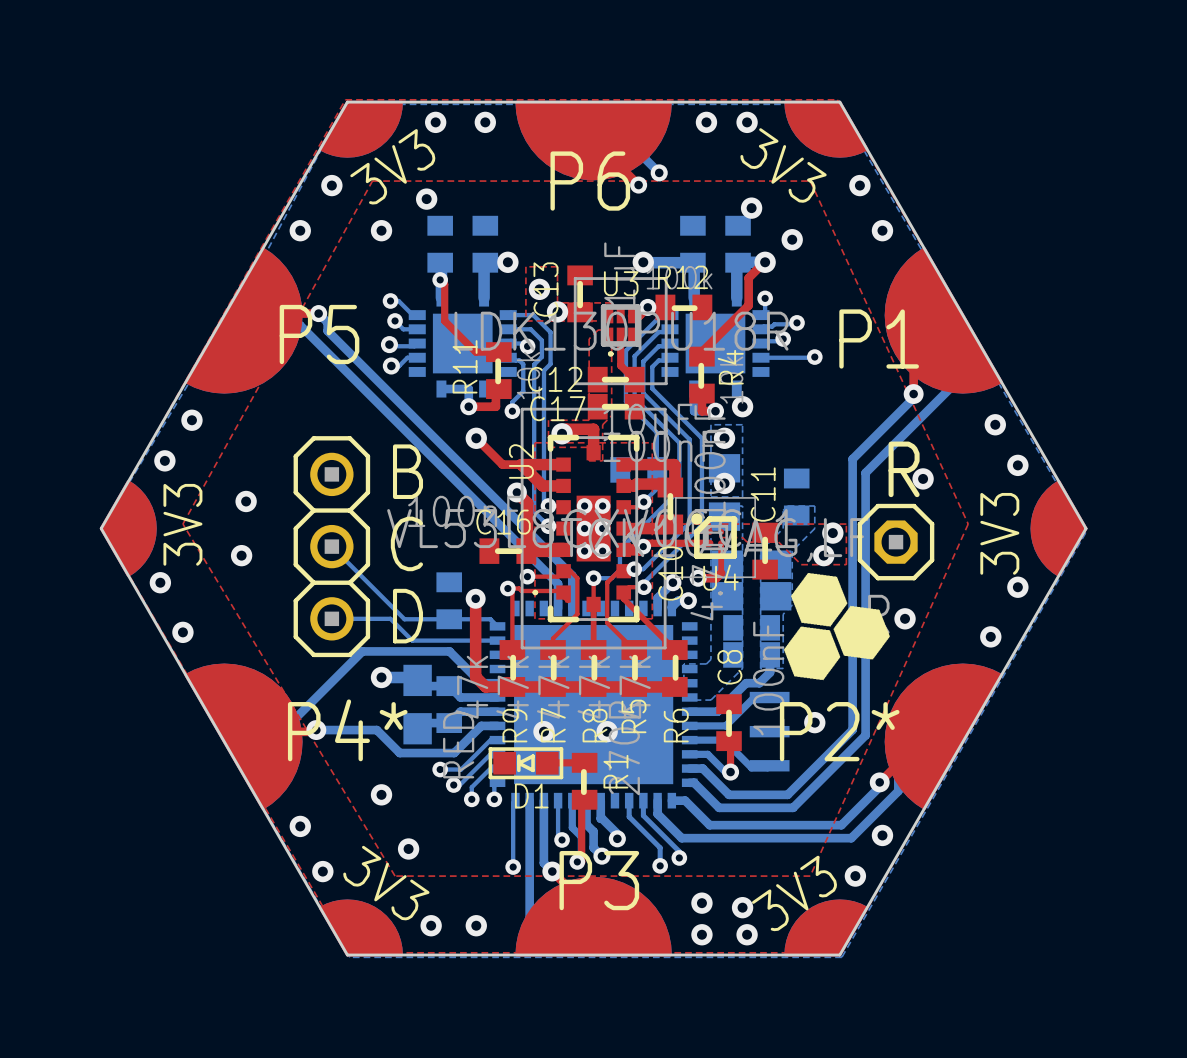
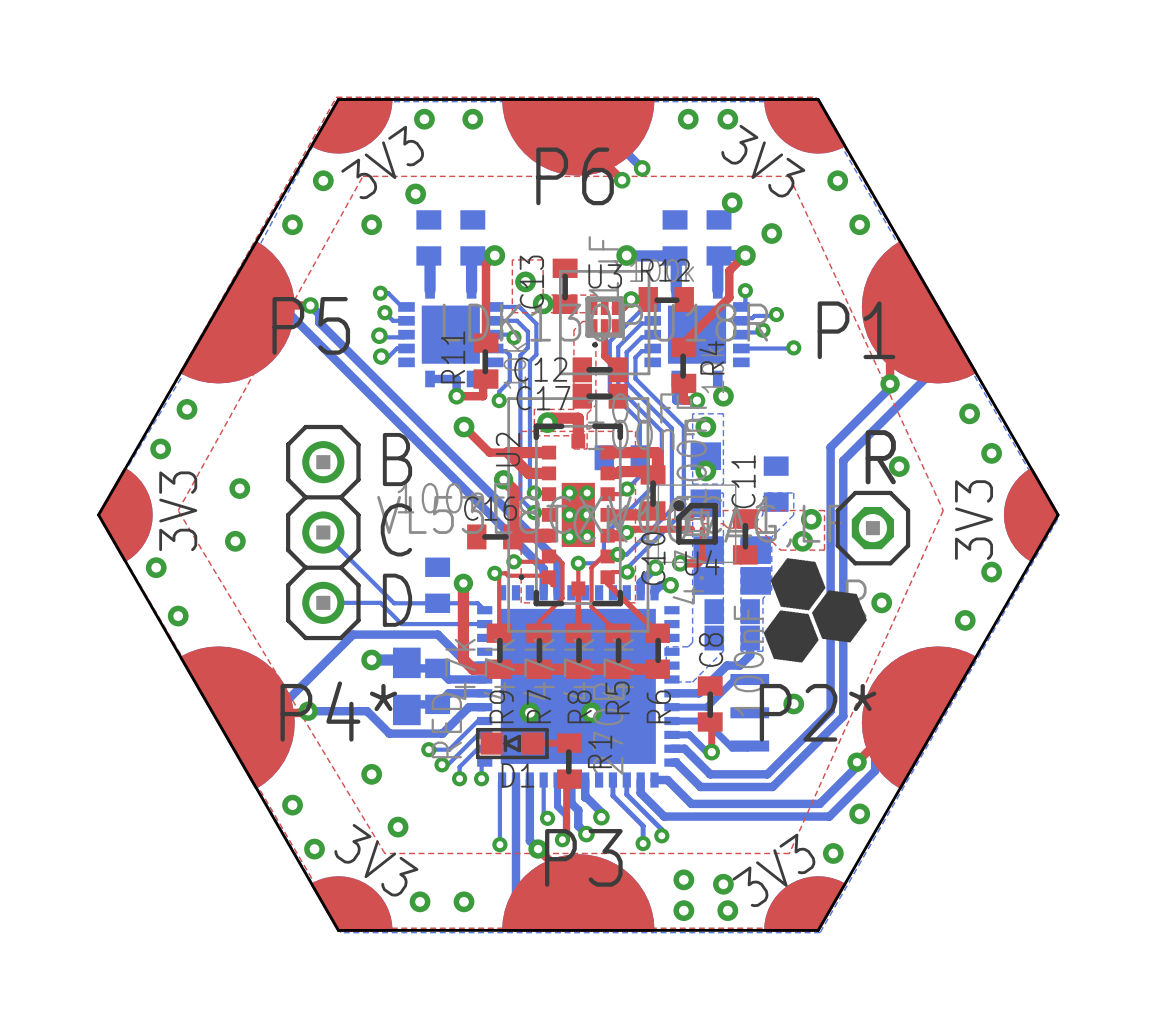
top track: (440, 279) (444, 284) (444, 320) (475, 352) (498, 352) -> (494, 255) (485, 264) (485, 343)
via: (440, 279) -> none

